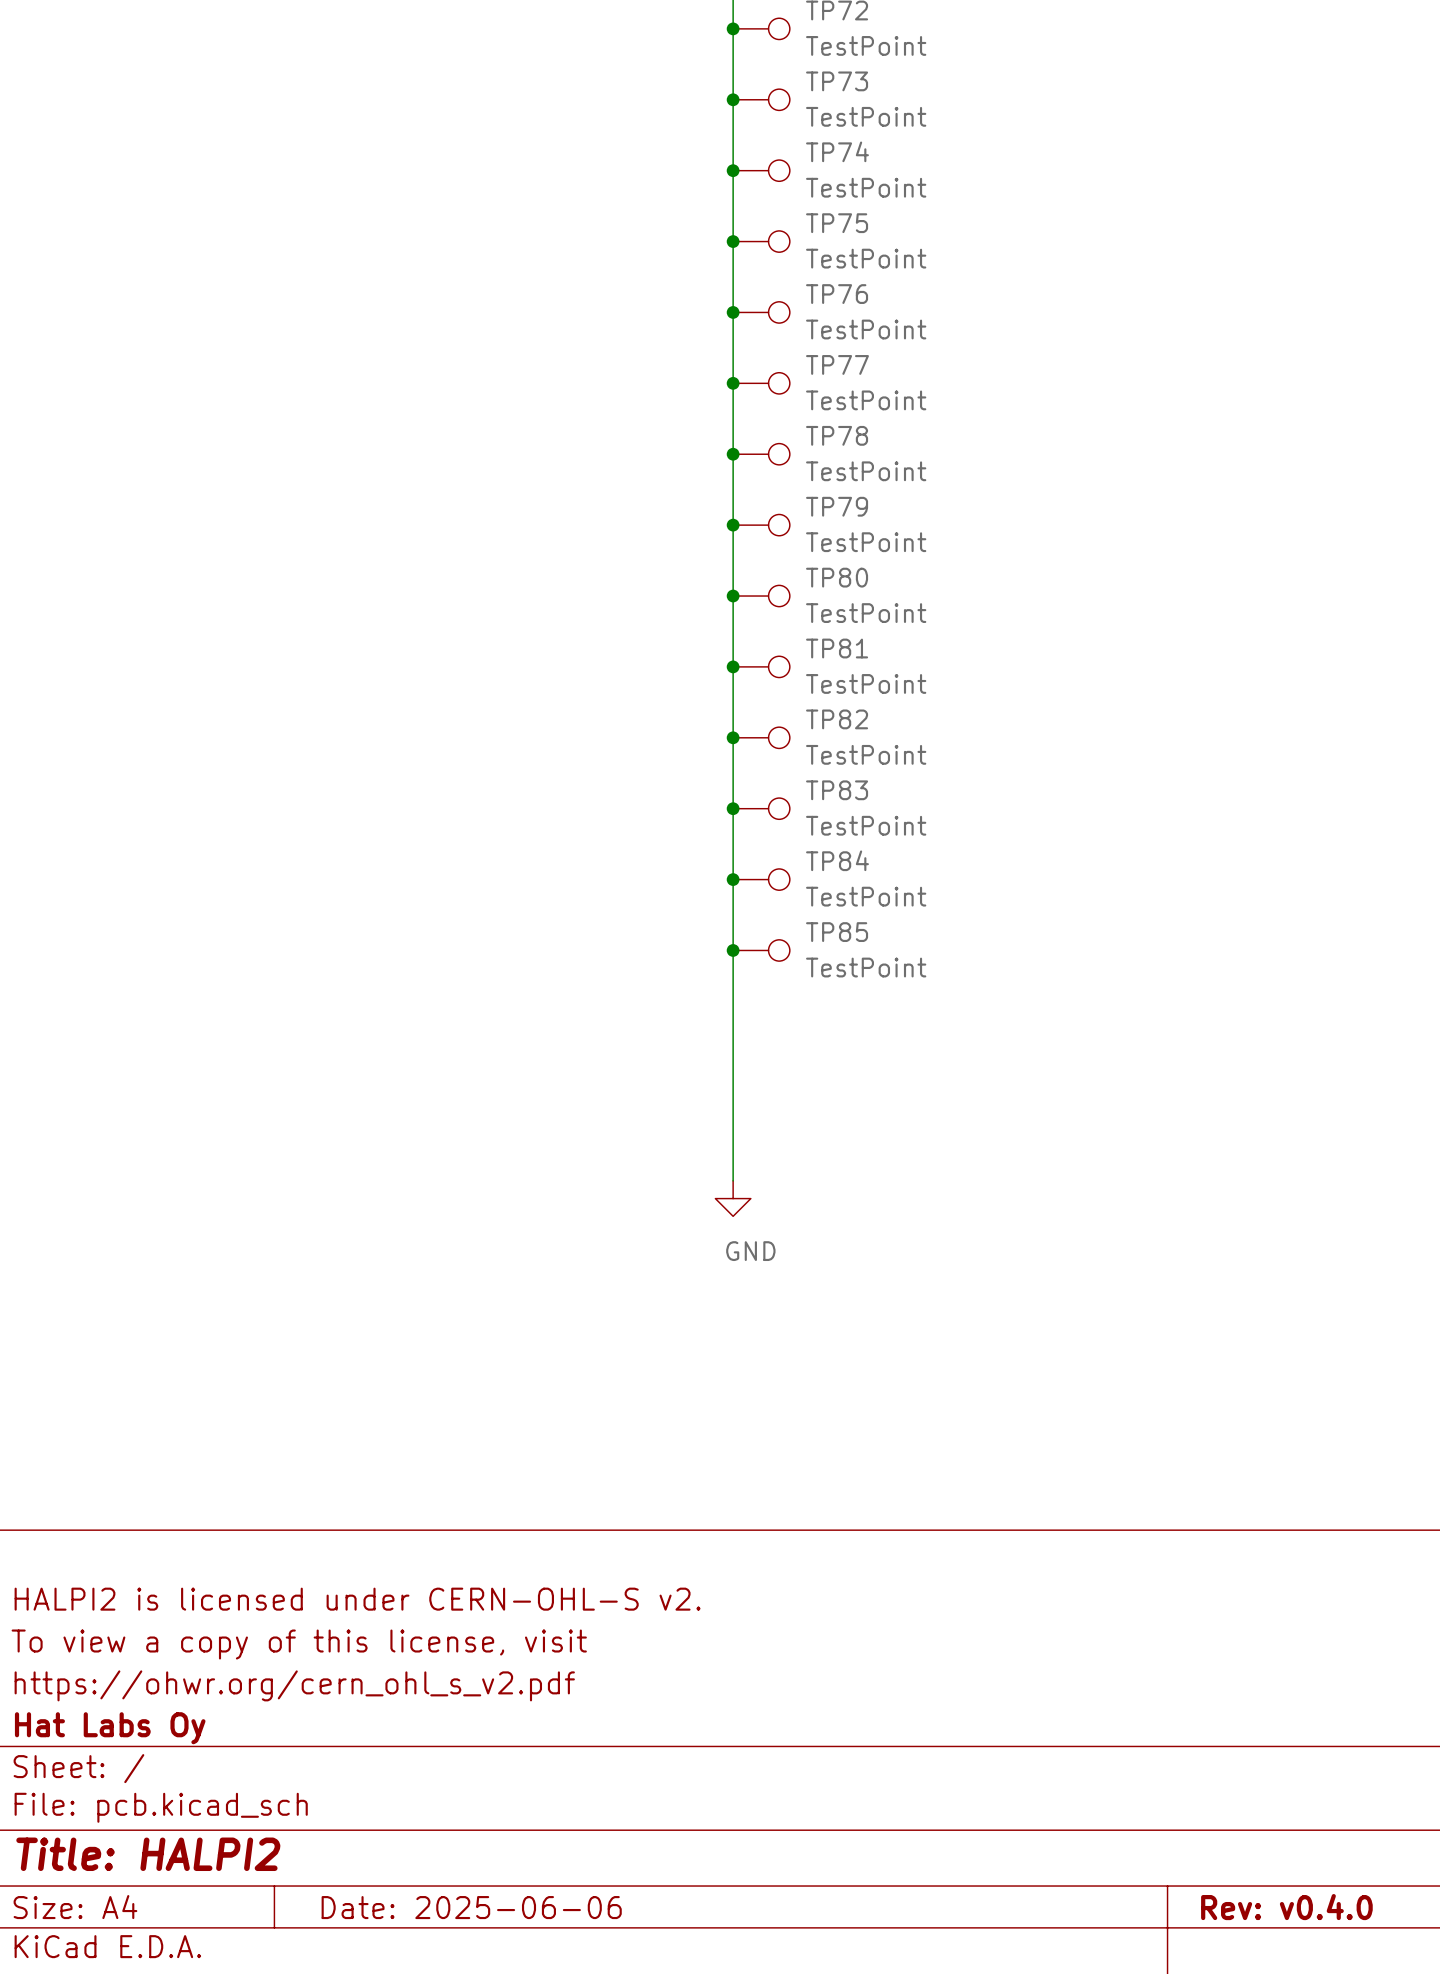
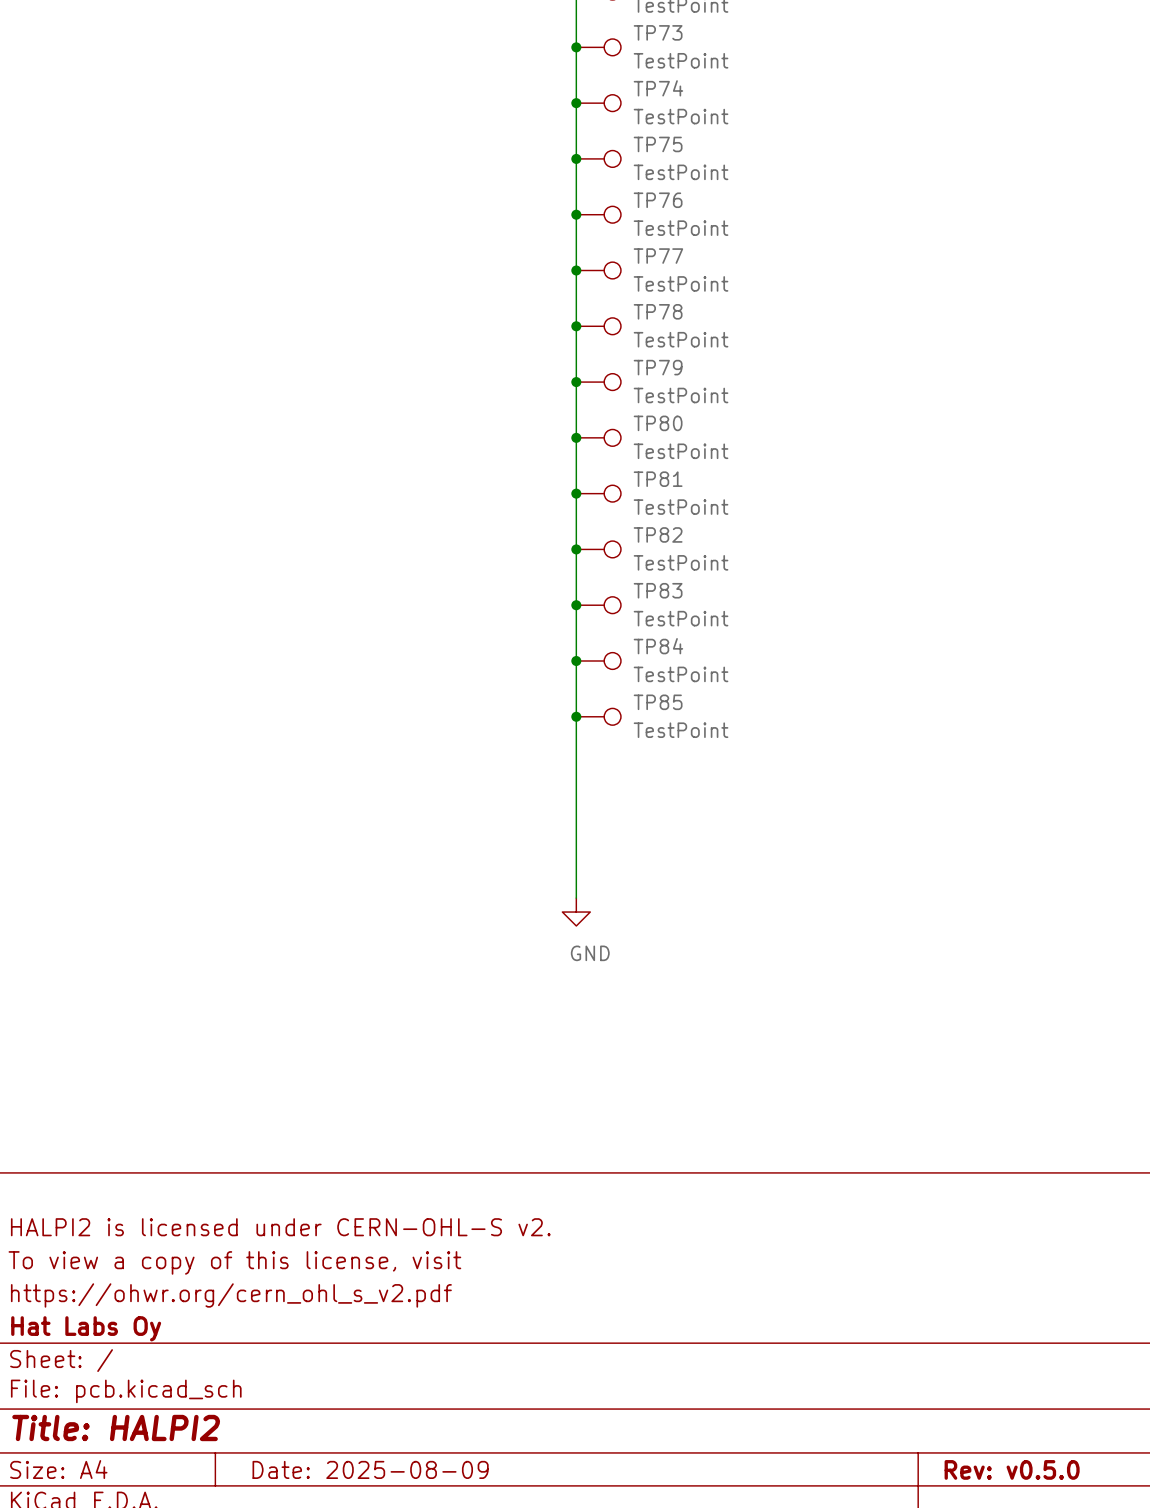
title block: Date: 2025-06-06 (471, 1907) -> Date: 2025-08-09 (370, 1469)
title block: Rev: v0.4.0 (1286, 1907) -> Rev: v0.5.0 (1012, 1469)

